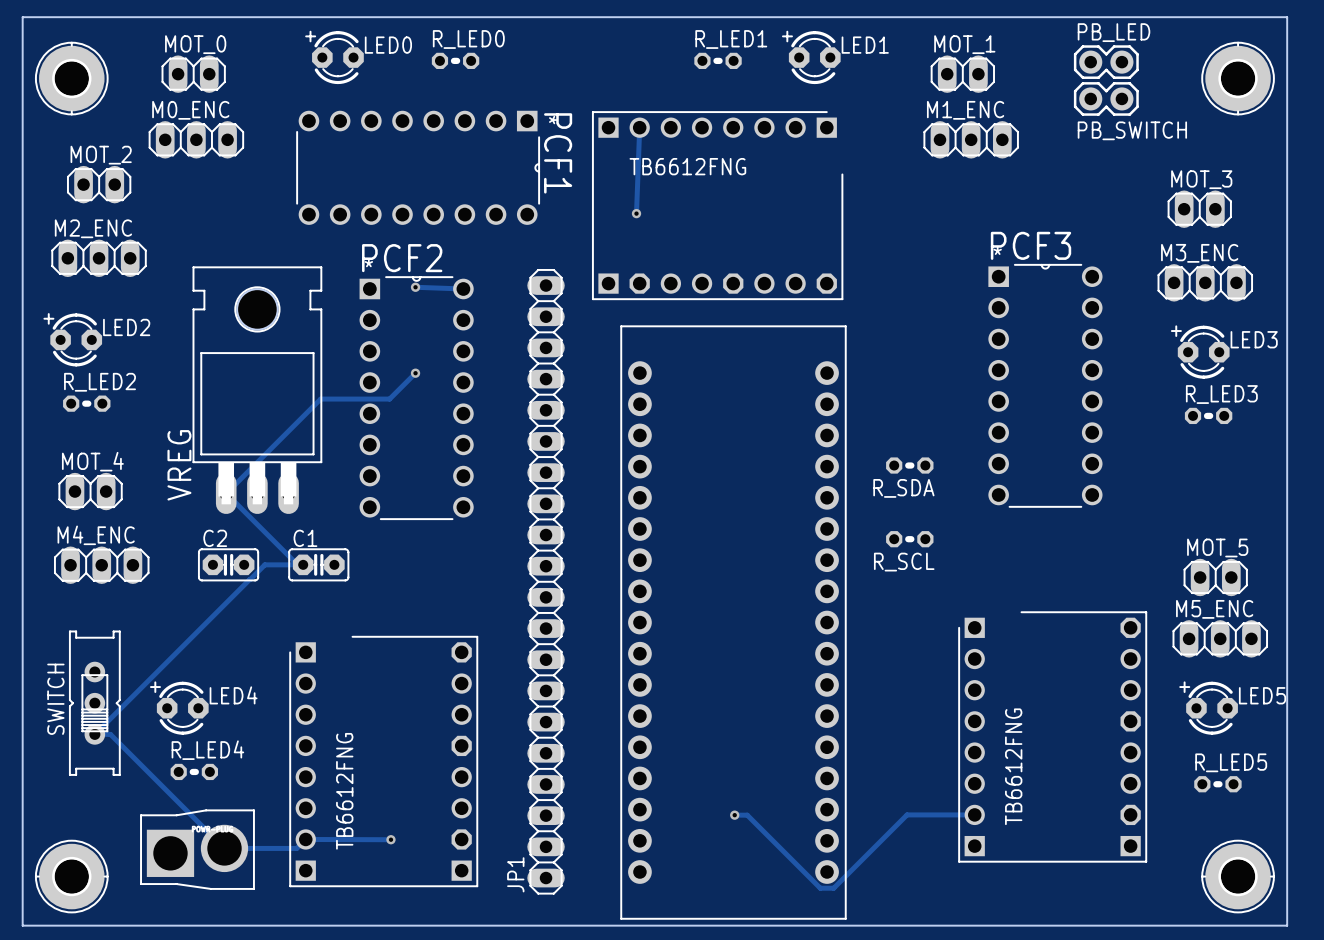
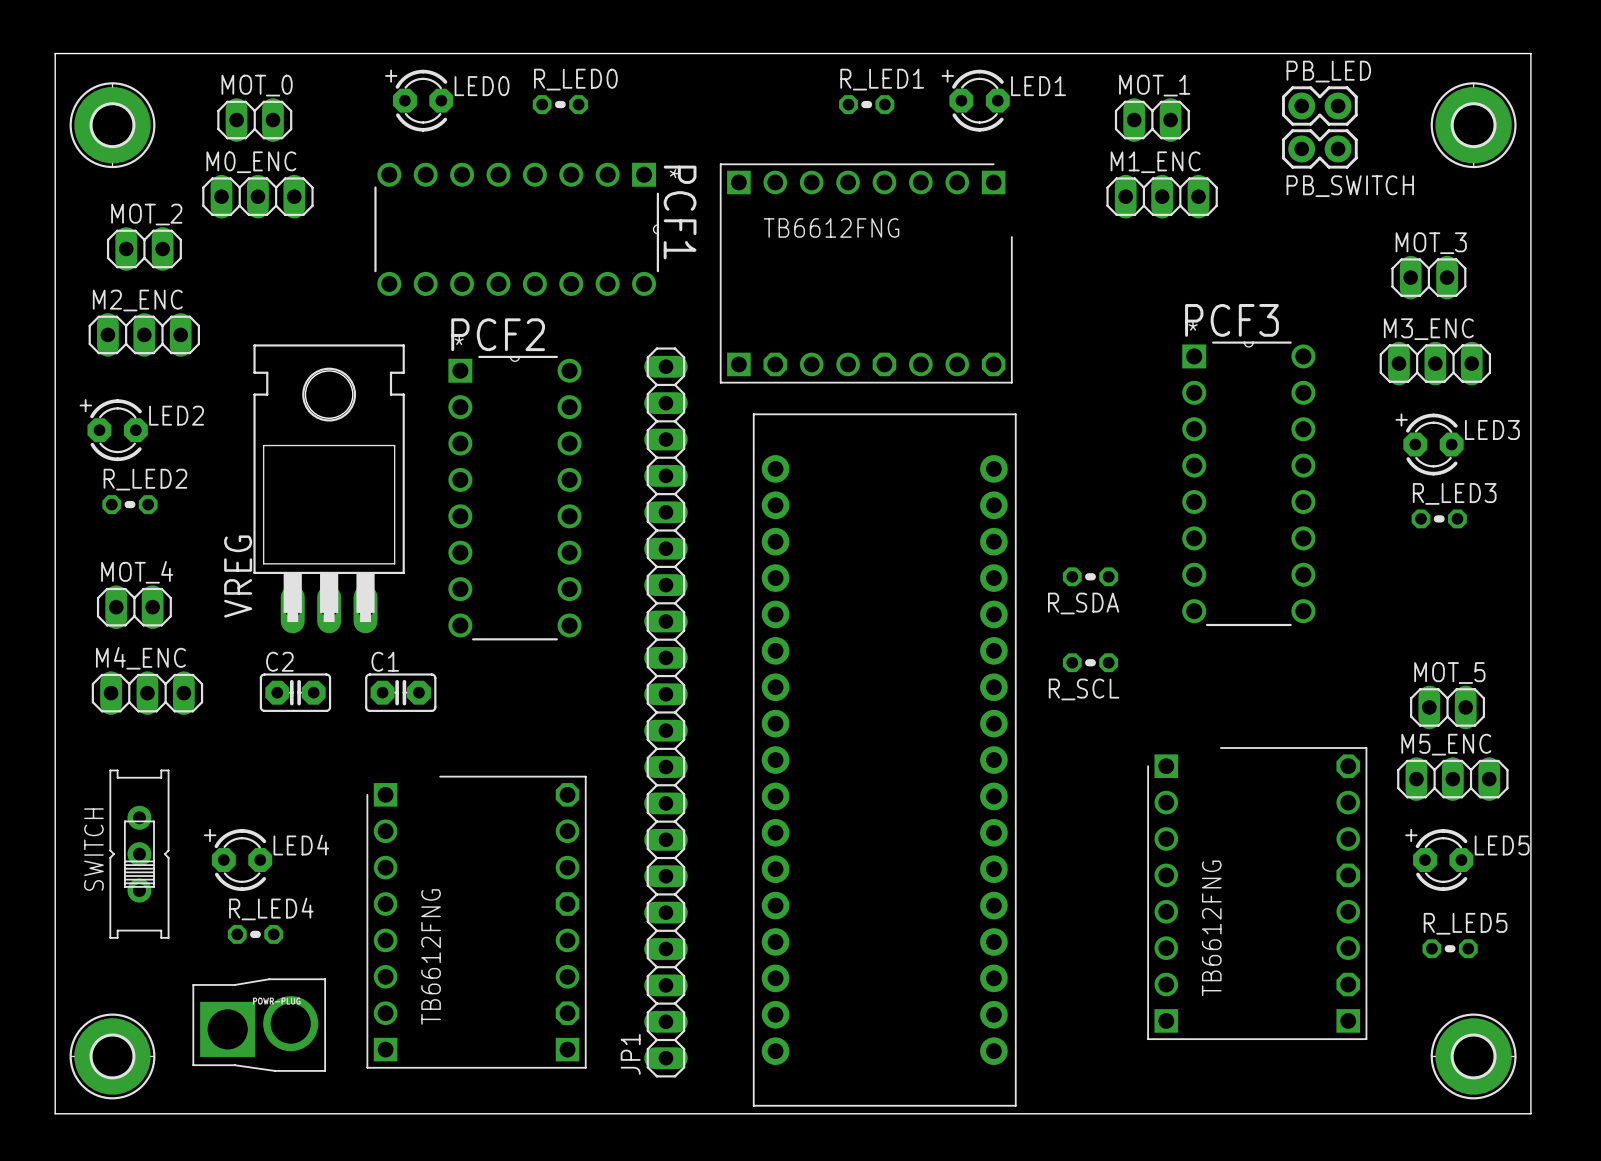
track: (639, 127) (636, 213) -> none
via: (636, 213) -> none
track: (415, 287) (463, 288) -> none
via: (415, 287) -> none
track: (415, 373) (389, 399) (320, 399) (226, 493) -> none
via: (415, 373) -> none
track: (226, 493) (297, 564) -> none
track: (303, 564) (264, 564) (94, 734) (110, 734) (224, 848) (296, 848) (305, 839) (390, 839) -> none
track: (974, 814) (907, 814) (833, 888) (820, 888) (747, 815) (734, 815) -> none
via: (734, 815) -> none
via: (390, 839) -> none

